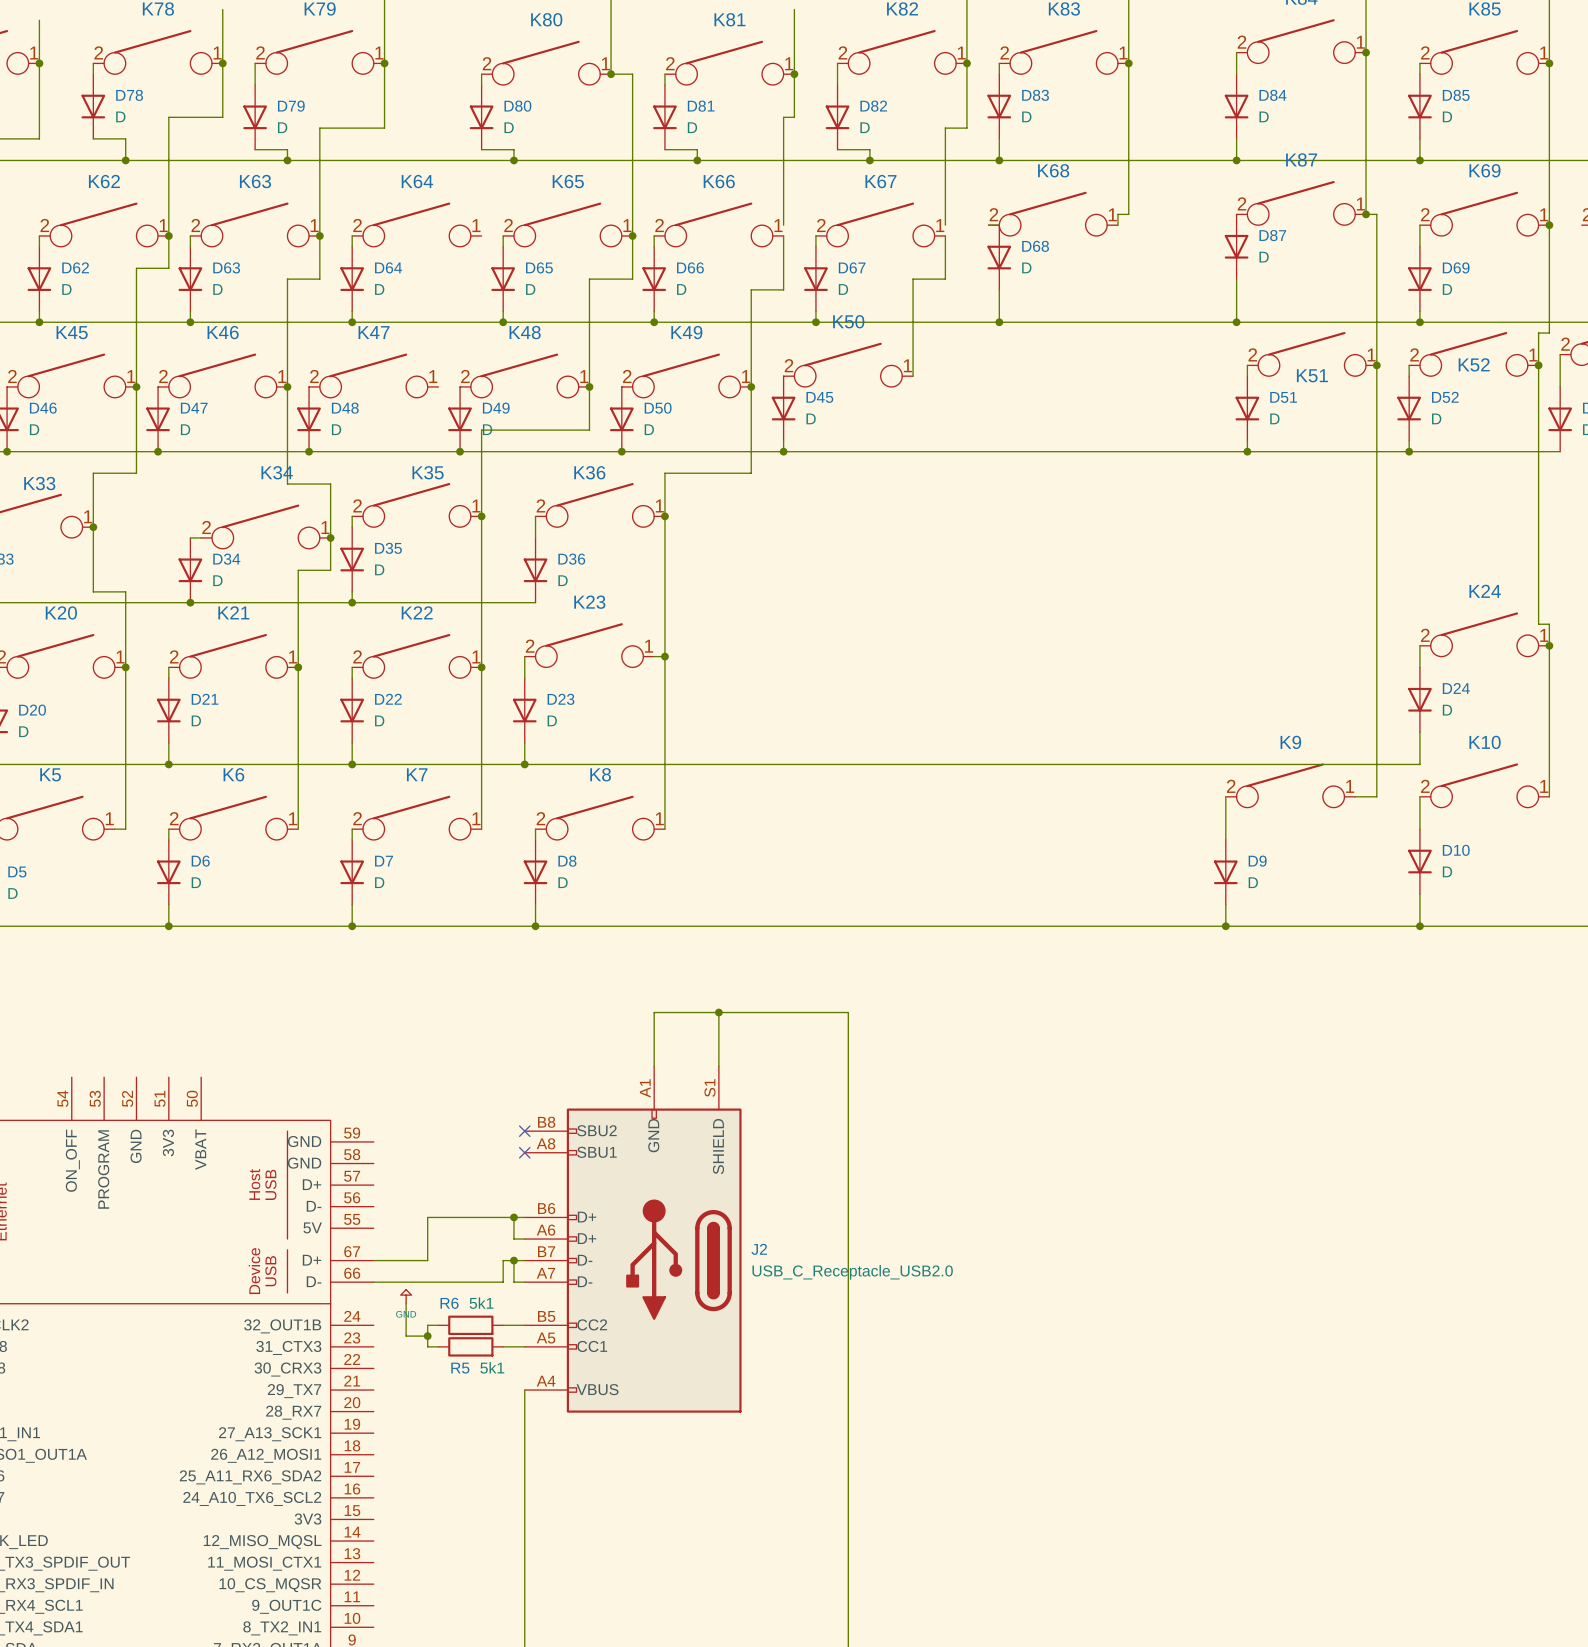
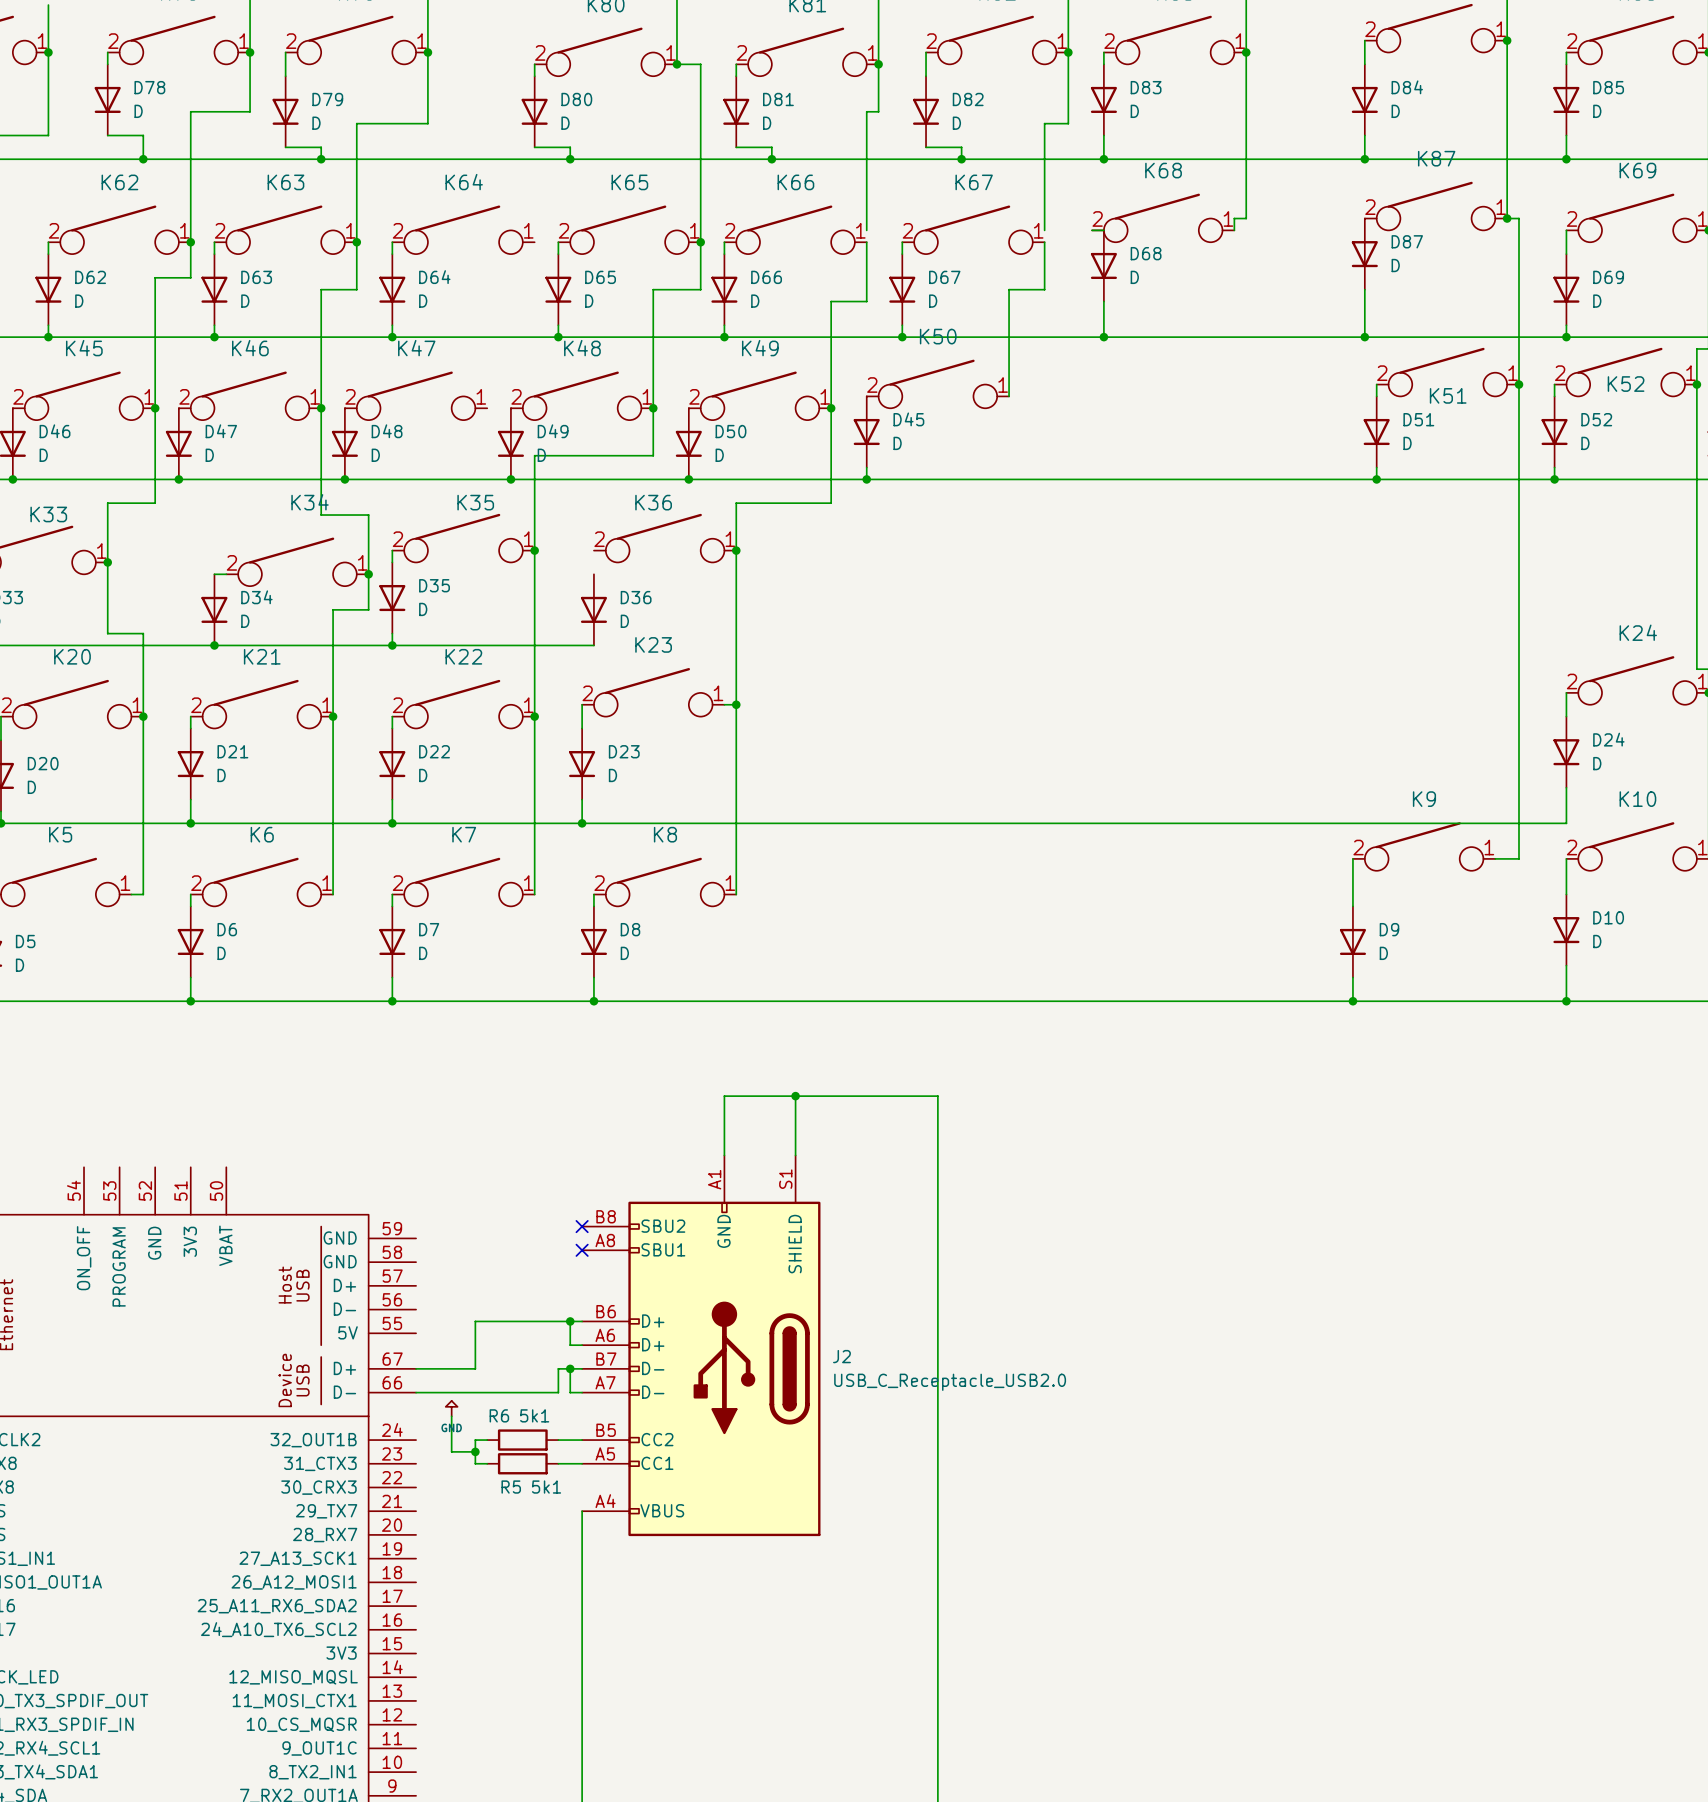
wire: (535, 516) (535, 537) -> none

